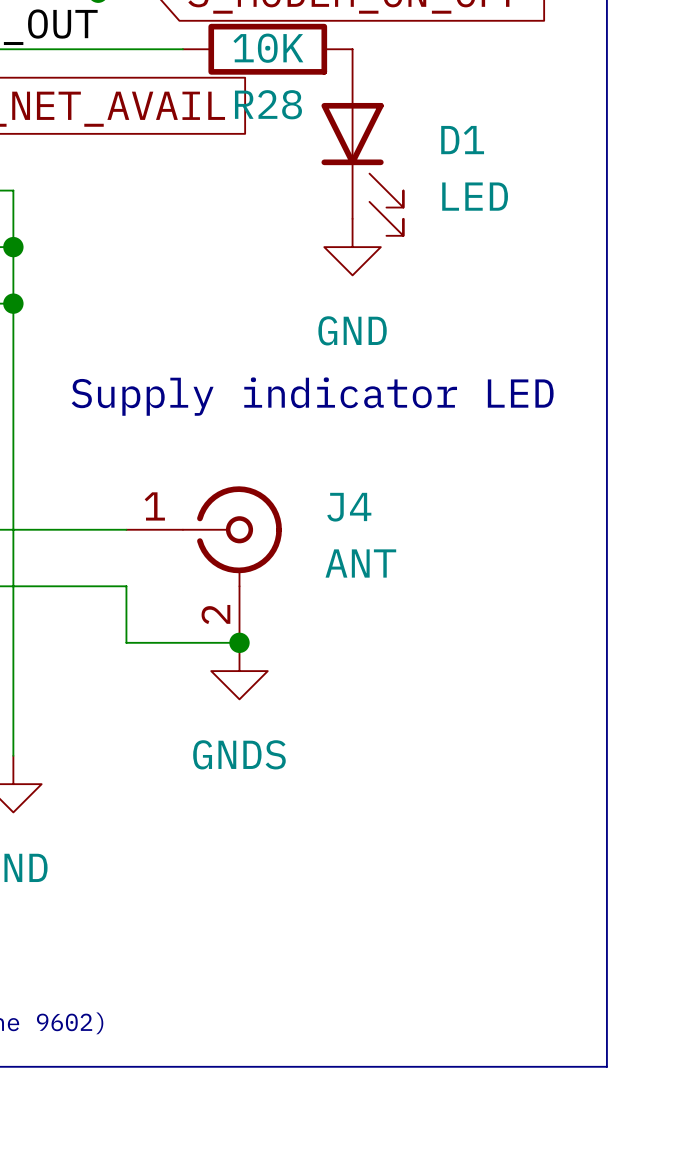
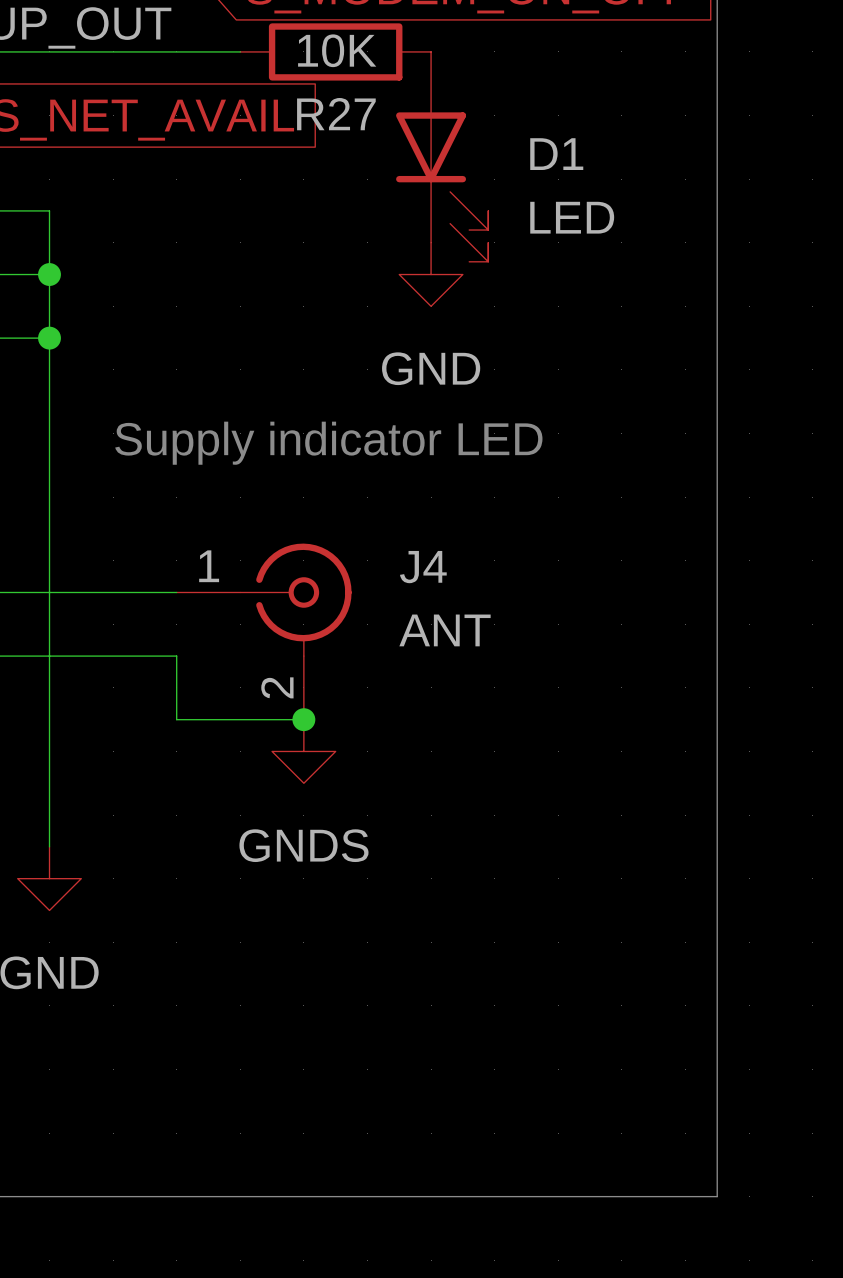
R28 name: R28 (268, 104) -> R27 (336, 114)

